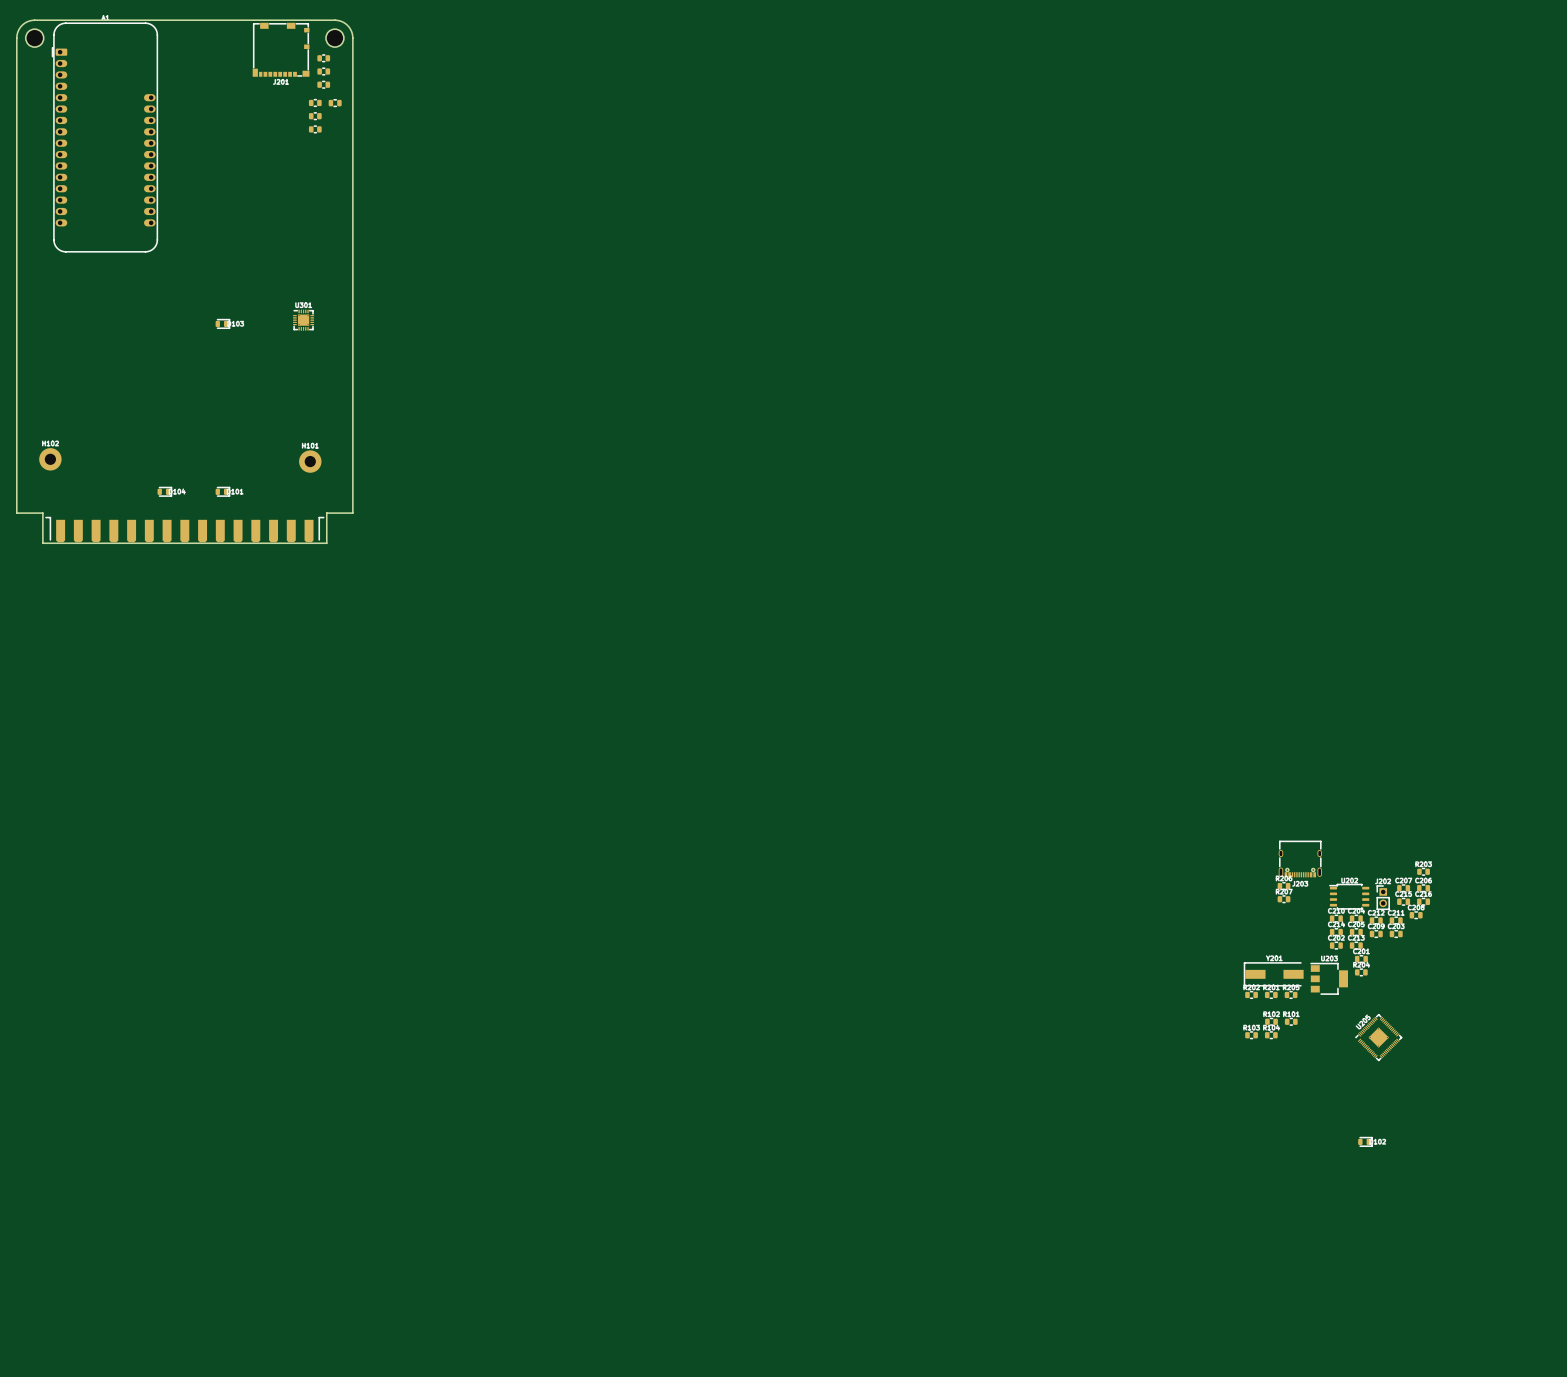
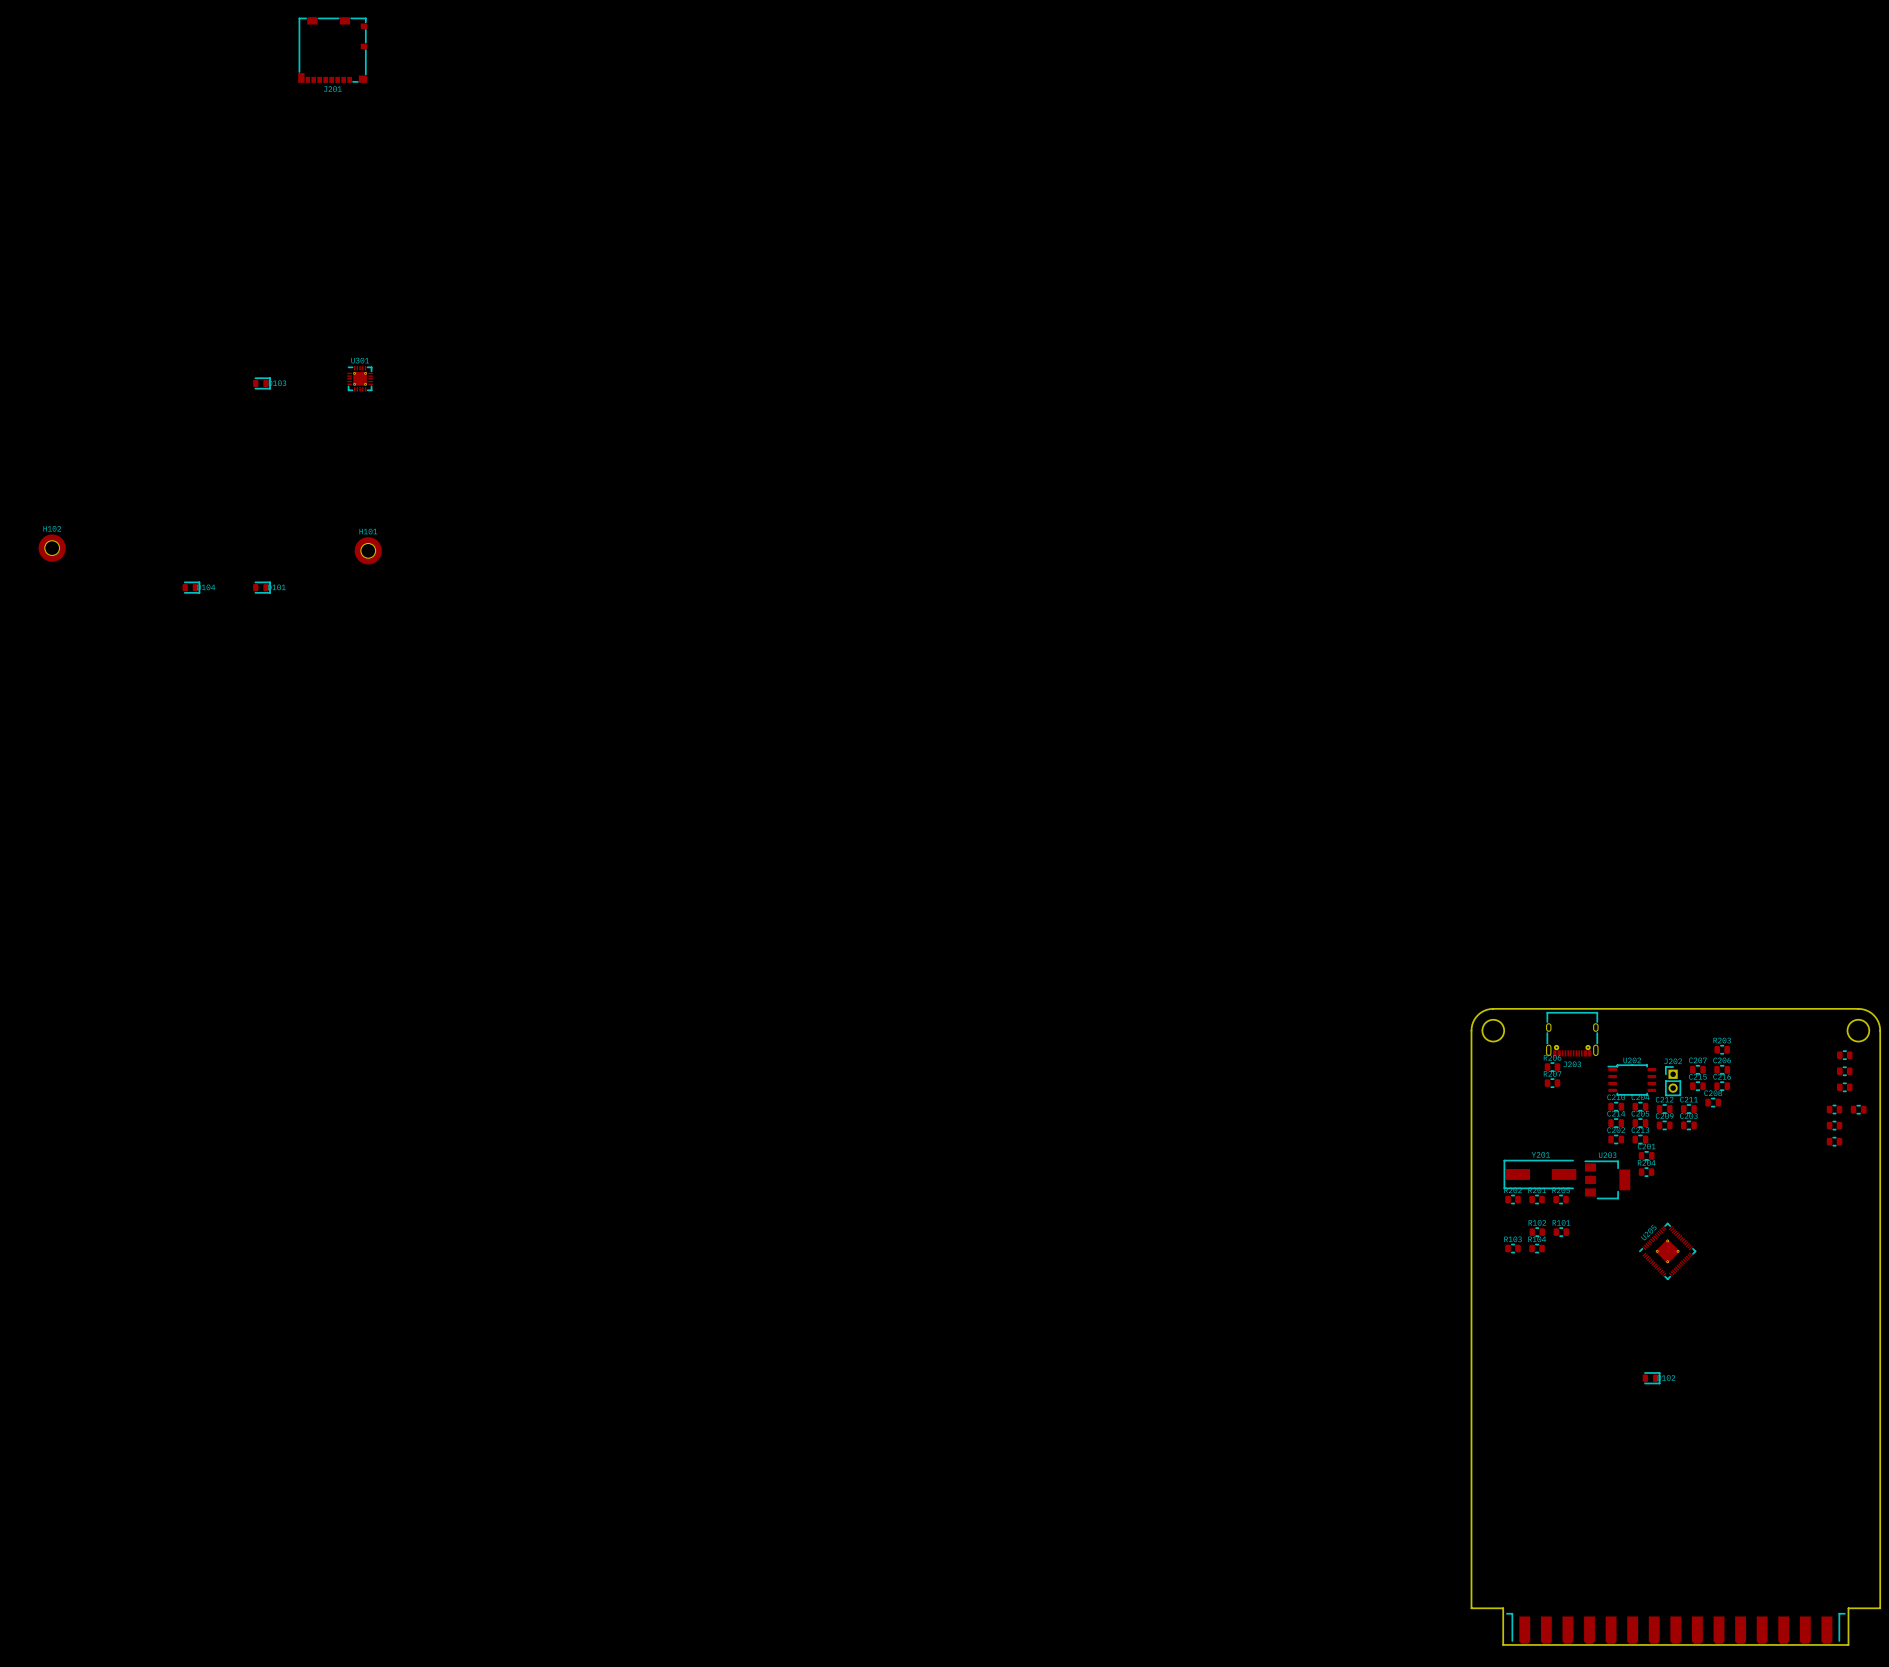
part: (323, 58) -> none
part: (323, 71) -> none
part: (323, 84) -> none
part: (315, 102) -> none
part: (335, 103) -> none
part: (315, 116) -> none
part: (315, 129) -> none
part: (104, 137) -> none
part: (184, 281) -> none
part: none -> (1844, 1055)
part: none -> (1844, 1071)
part: none -> (1844, 1087)
part: none -> (1834, 1109)
part: none -> (1858, 1109)
part: none -> (1834, 1125)
part: none -> (1834, 1141)
part: none -> (1675, 1326)

